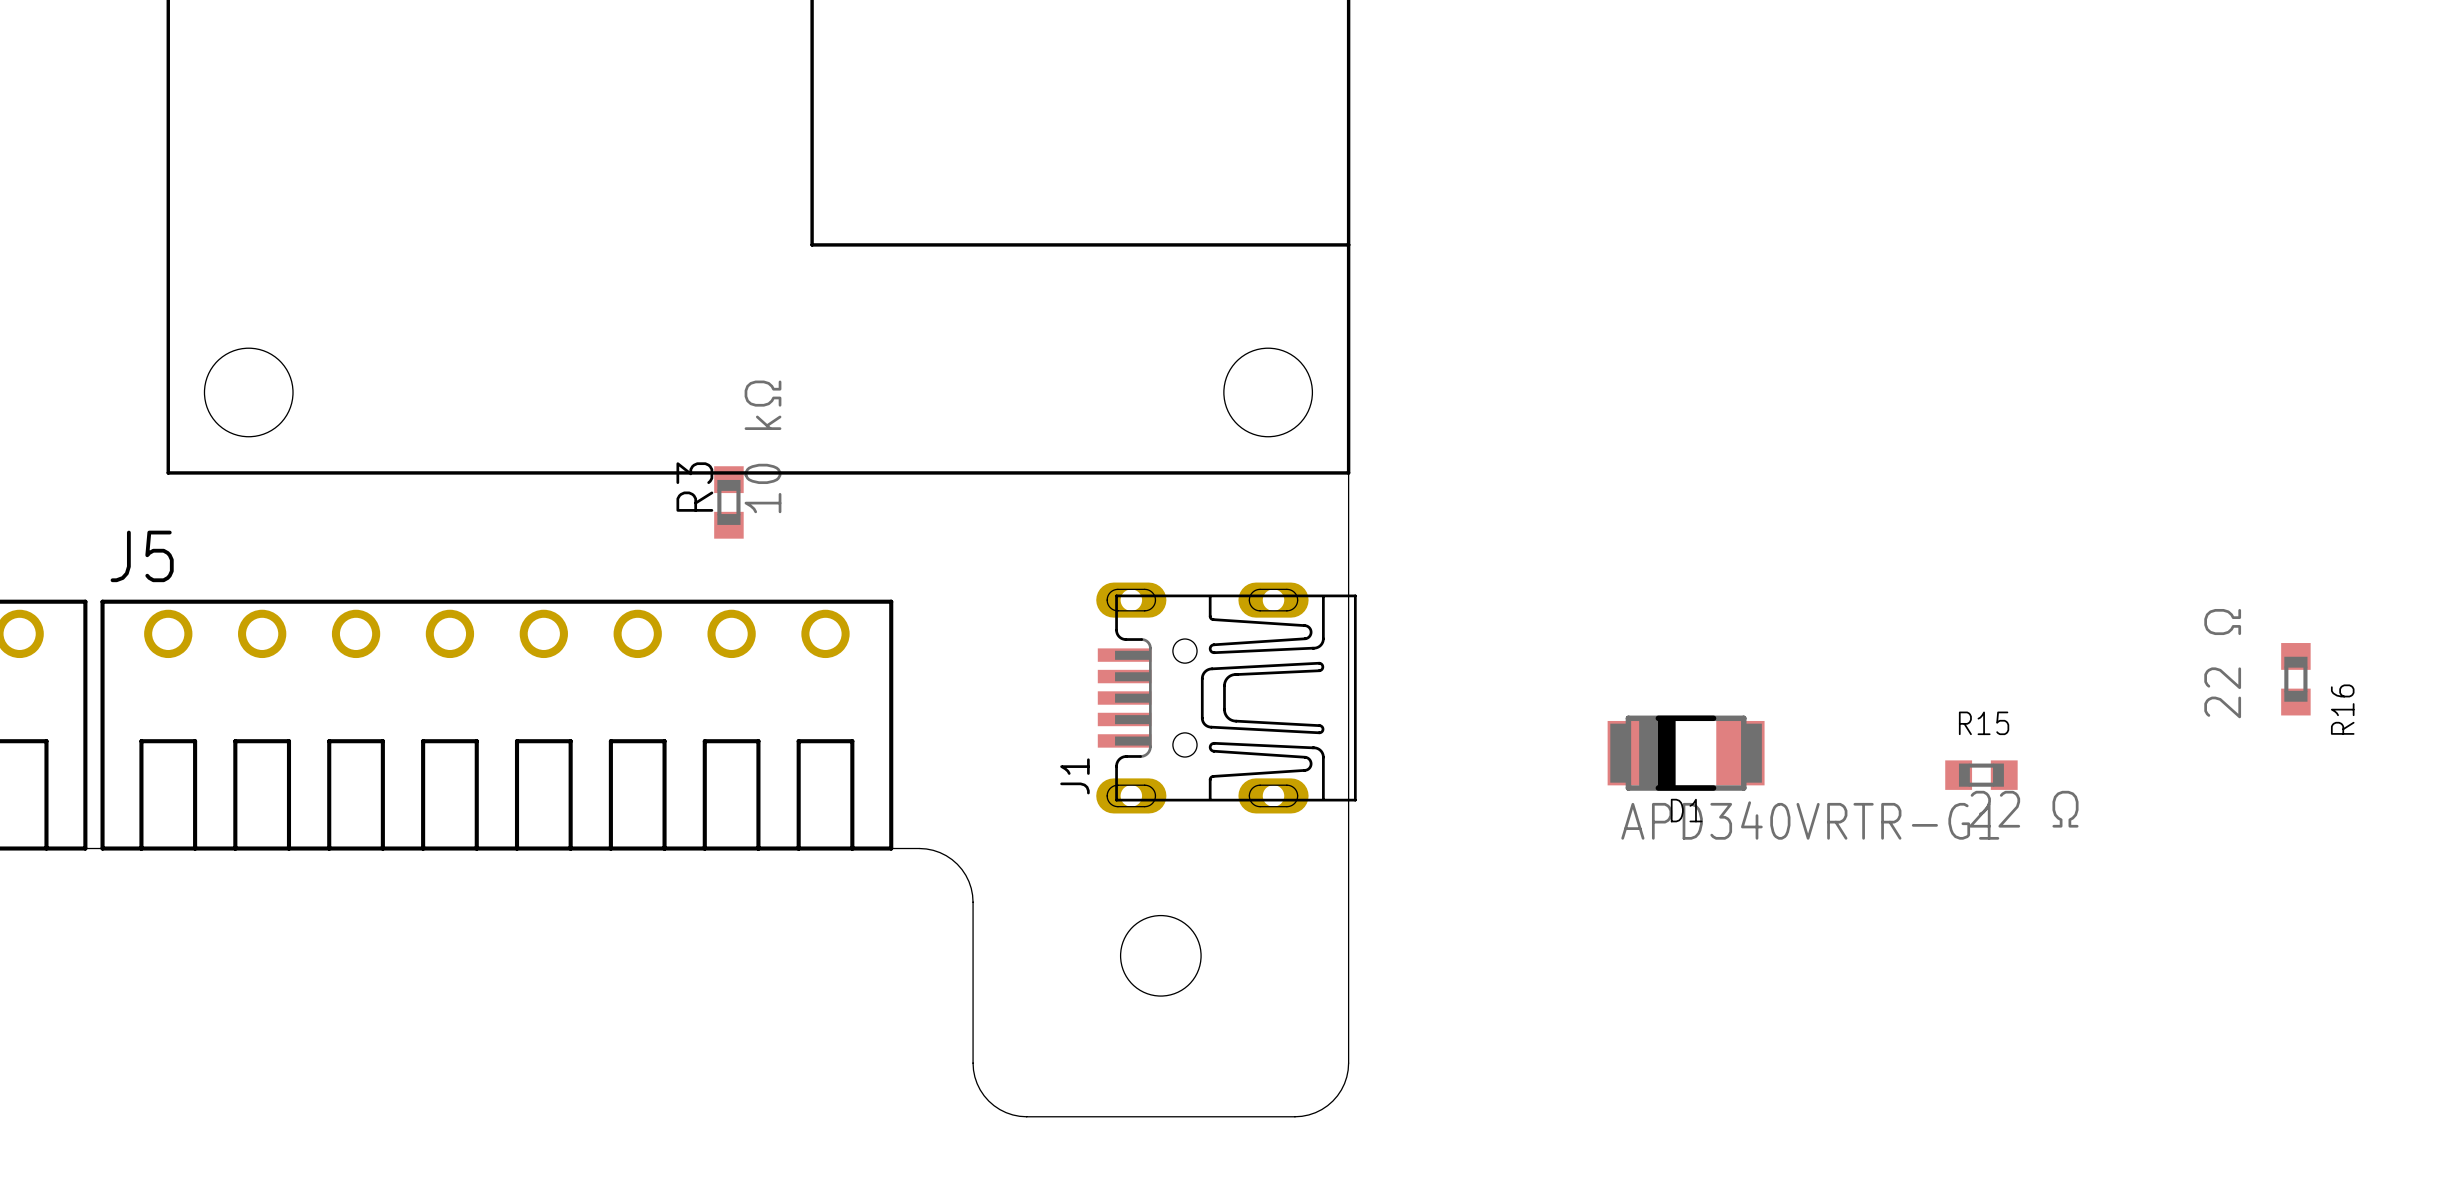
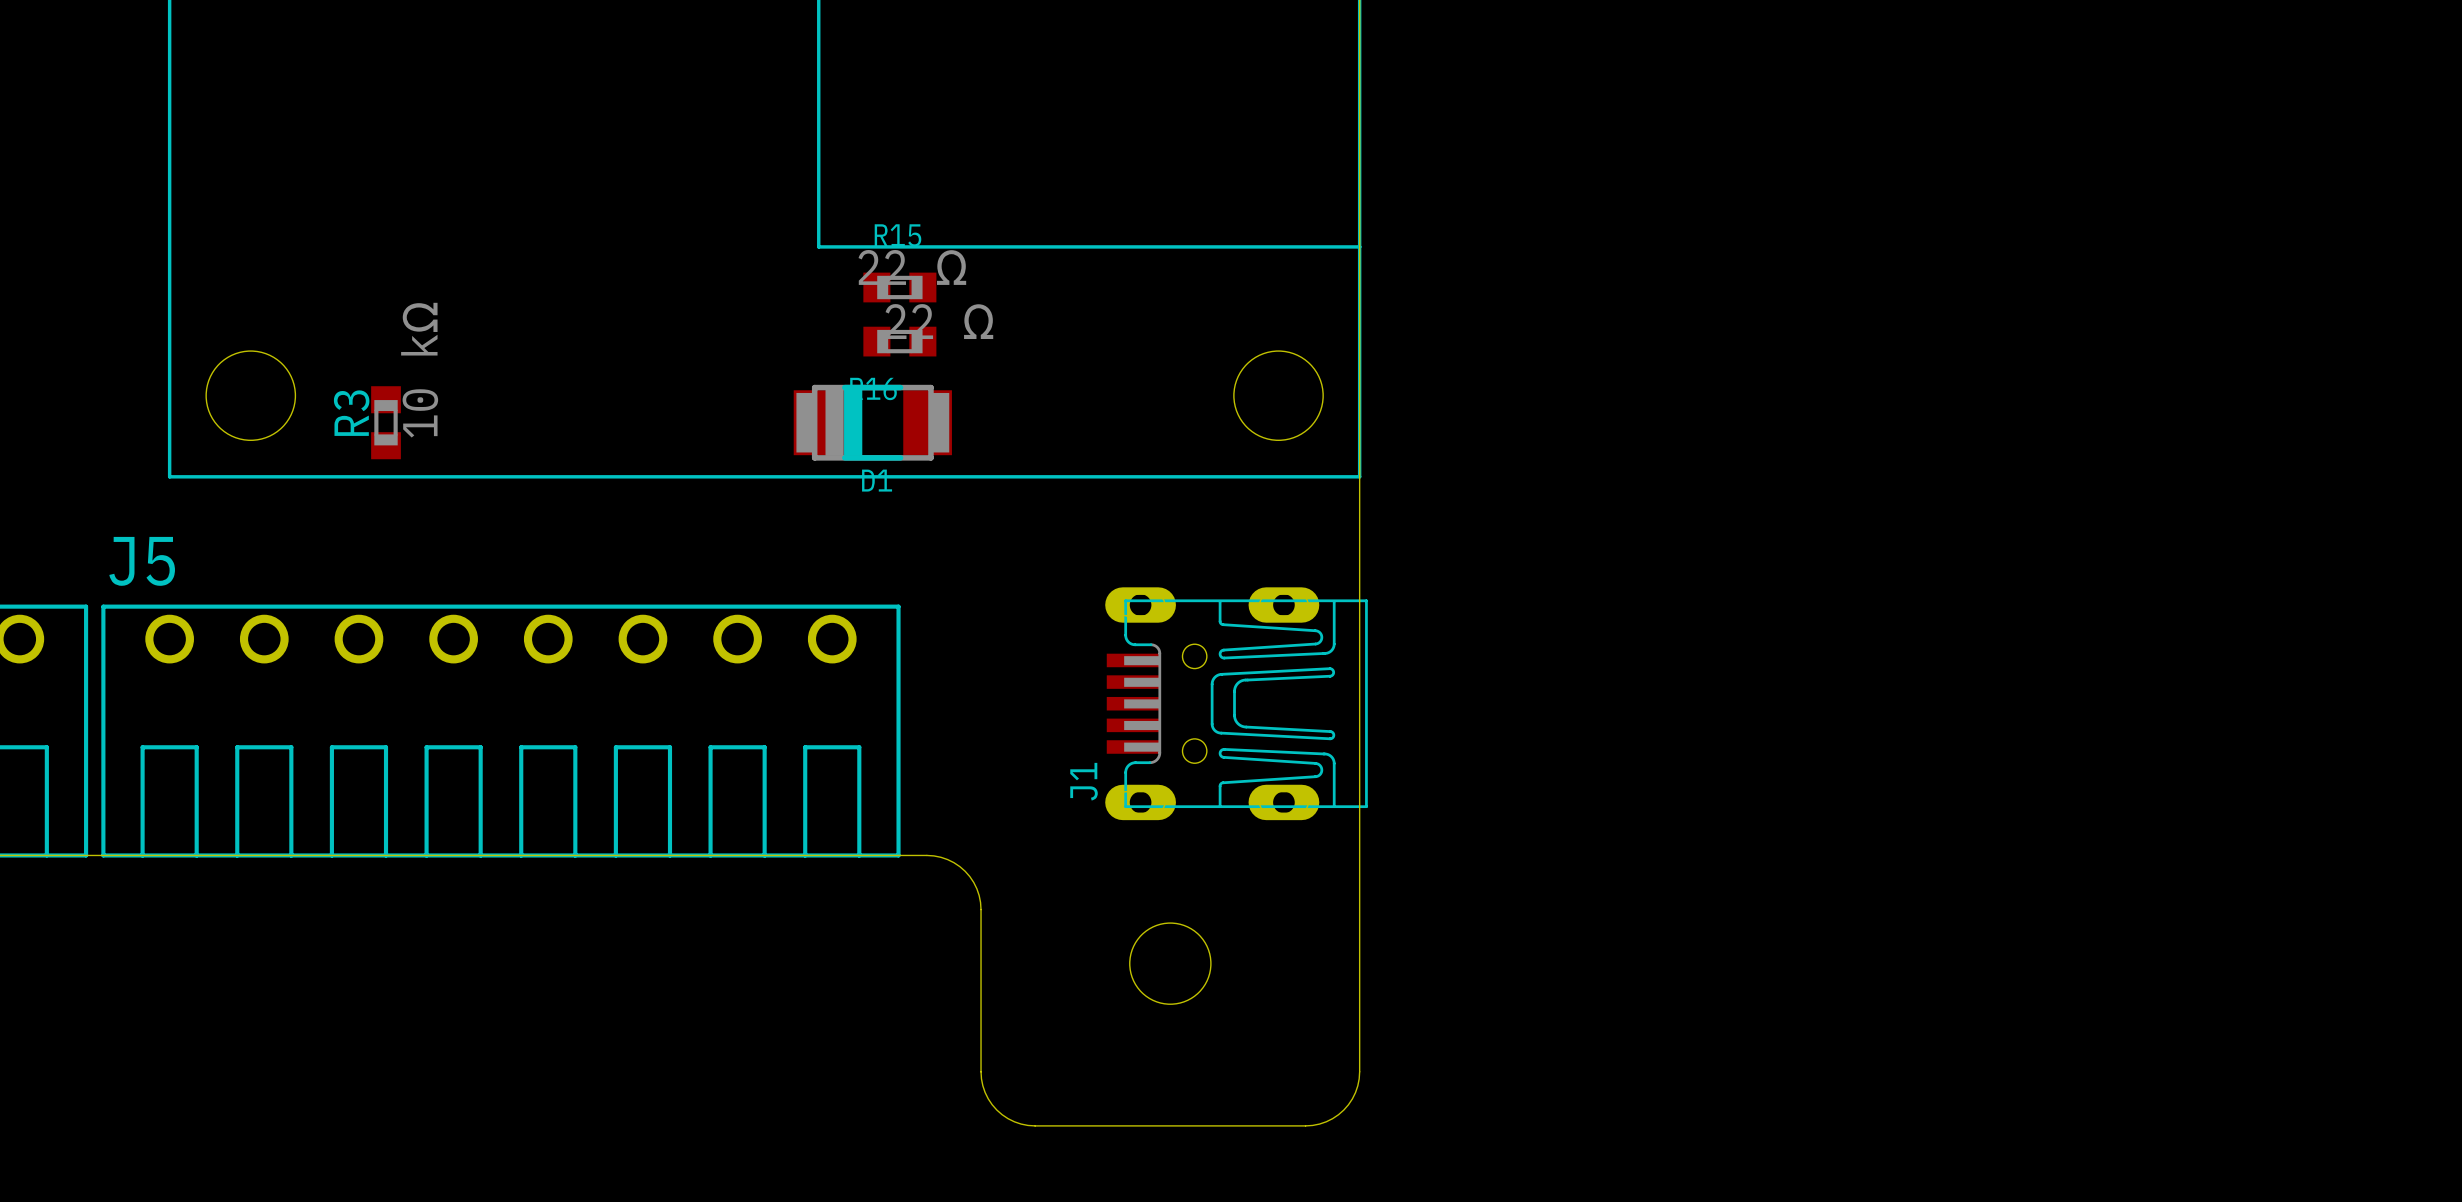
R3 position: (728, 502) -> (386, 422)
R16 rotation: 0° (2295, 679) -> 90° clockwise (899, 341)
R16 position: (2295, 679) -> (899, 341)
D1 position: (1686, 753) -> (872, 422)
R15 position: (1981, 775) -> (899, 287)
D1 value: APD340VRTR-G1 (1810, 820) -> none

